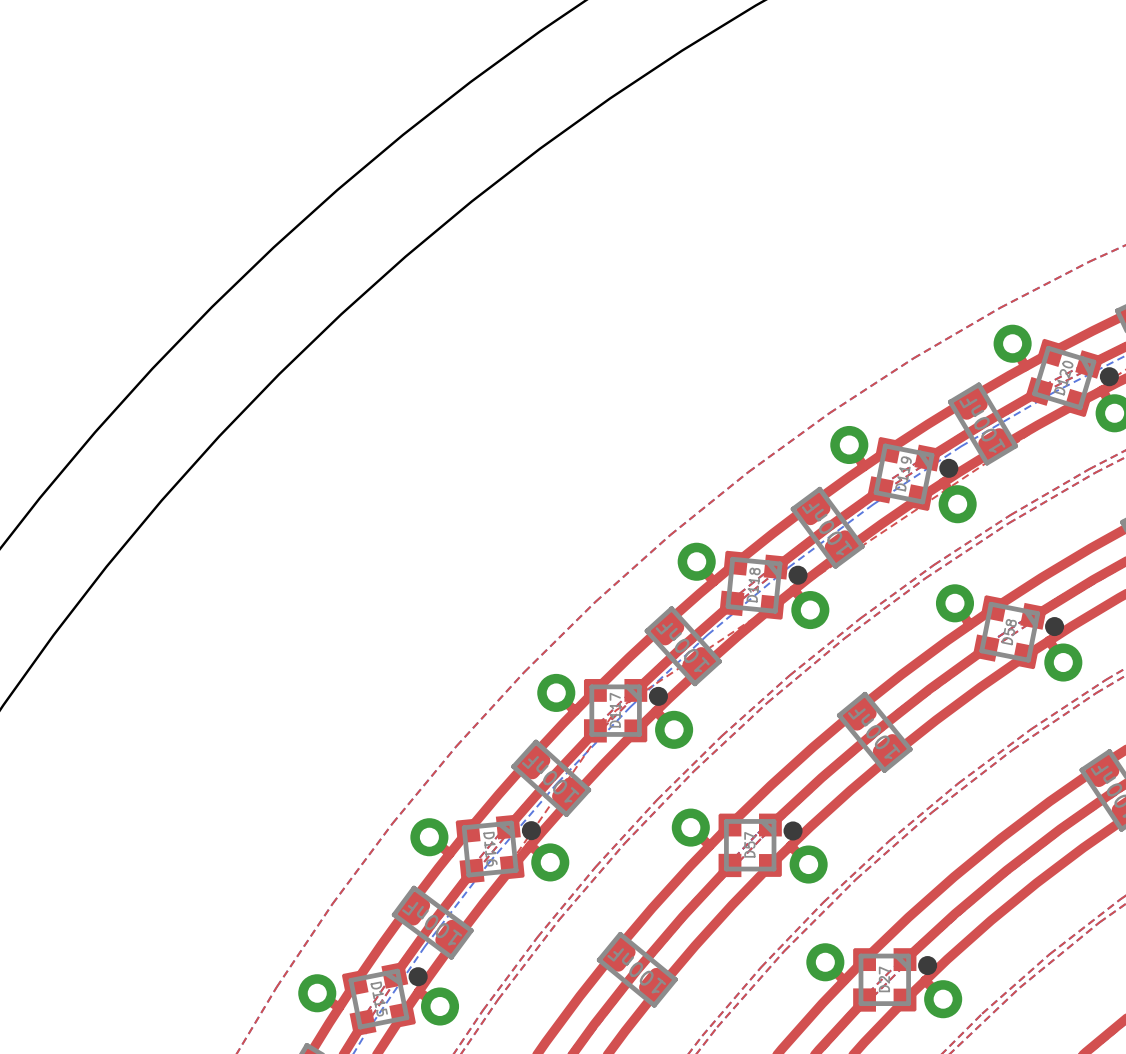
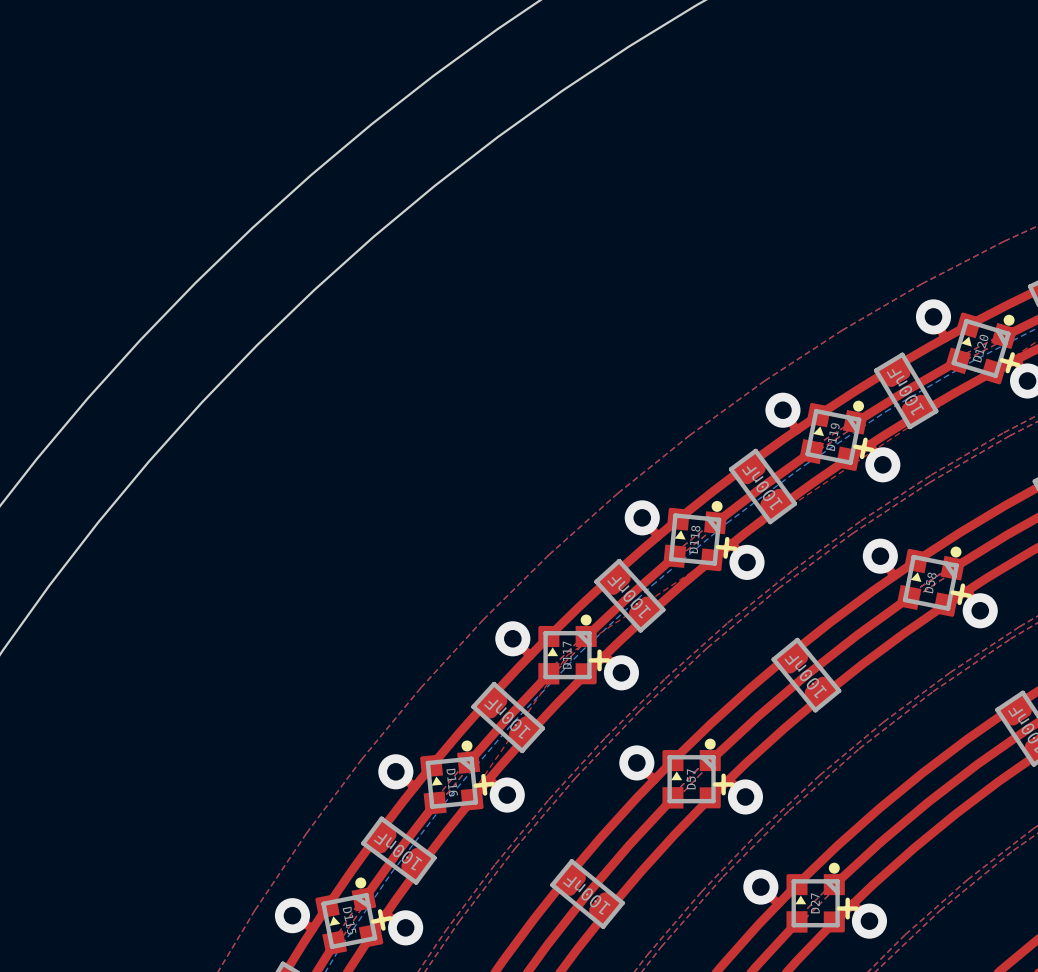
D120 footprint: [1025, 338, 1119, 418] -> [945, 312, 1021, 385]
D119 footprint: [867, 437, 959, 511] -> [799, 400, 875, 471]
D118 footprint: [719, 550, 808, 620] -> [663, 500, 738, 572]
D58 footprint: [972, 595, 1065, 670] -> [896, 546, 973, 617]
D117 footprint: [583, 679, 668, 743] -> [538, 614, 611, 685]
D57 footprint: [718, 813, 803, 878] -> [662, 738, 735, 809]
D116 footprint: [455, 814, 541, 884] -> [420, 740, 496, 815]
D27 footprint: [853, 948, 938, 1012] -> [786, 862, 859, 933]
D115 footprint: [341, 962, 428, 1037] -> [315, 877, 393, 956]

